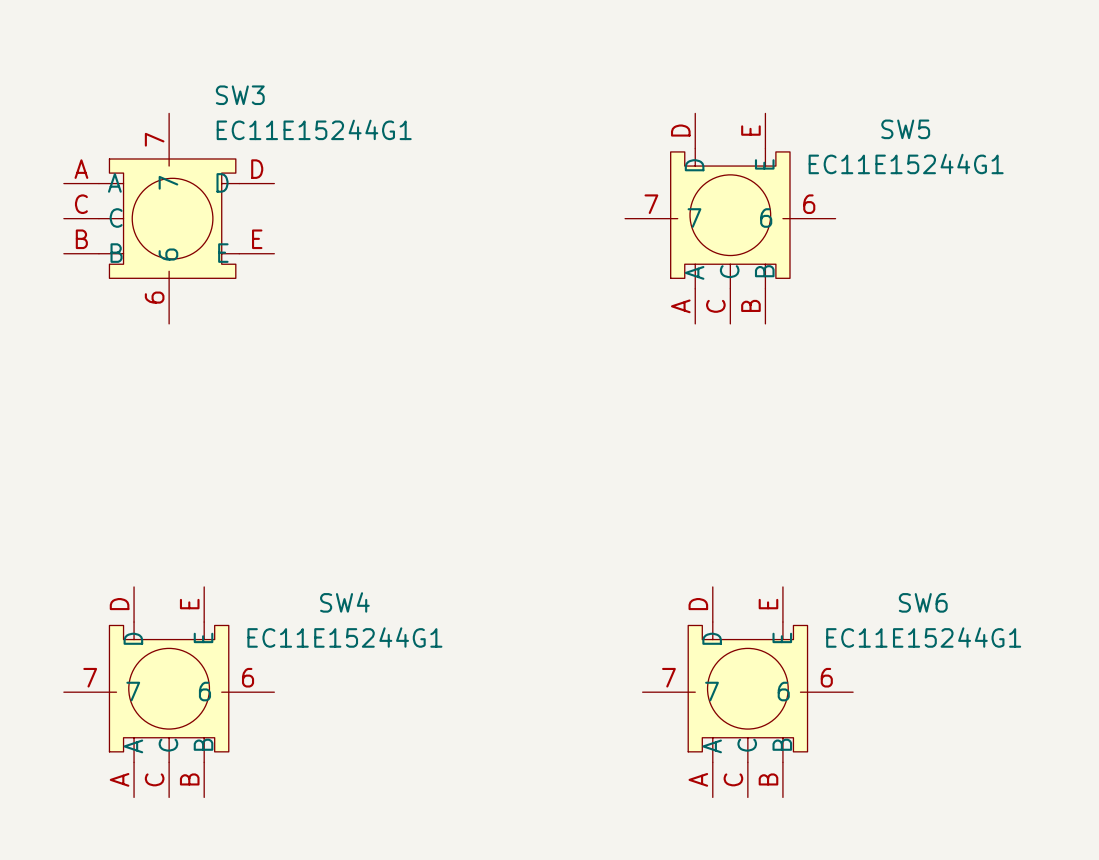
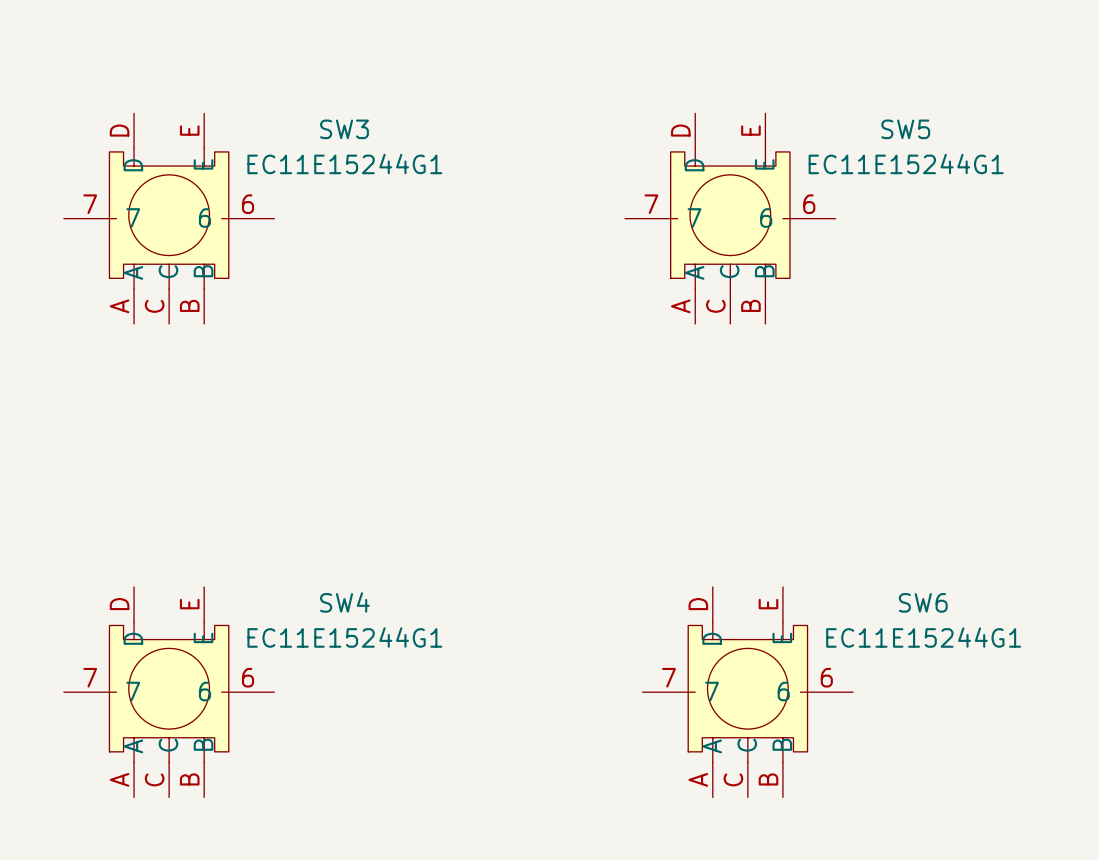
SW3 name position: SW3 (240, 95) -> SW3 (344, 129)
SW3 value position: EC11E15244G1 (314, 129) -> EC11E15244G1 (344, 163)
SW3 rotation: 0° (169, 218) -> 90° counterclockwise (169, 218)

